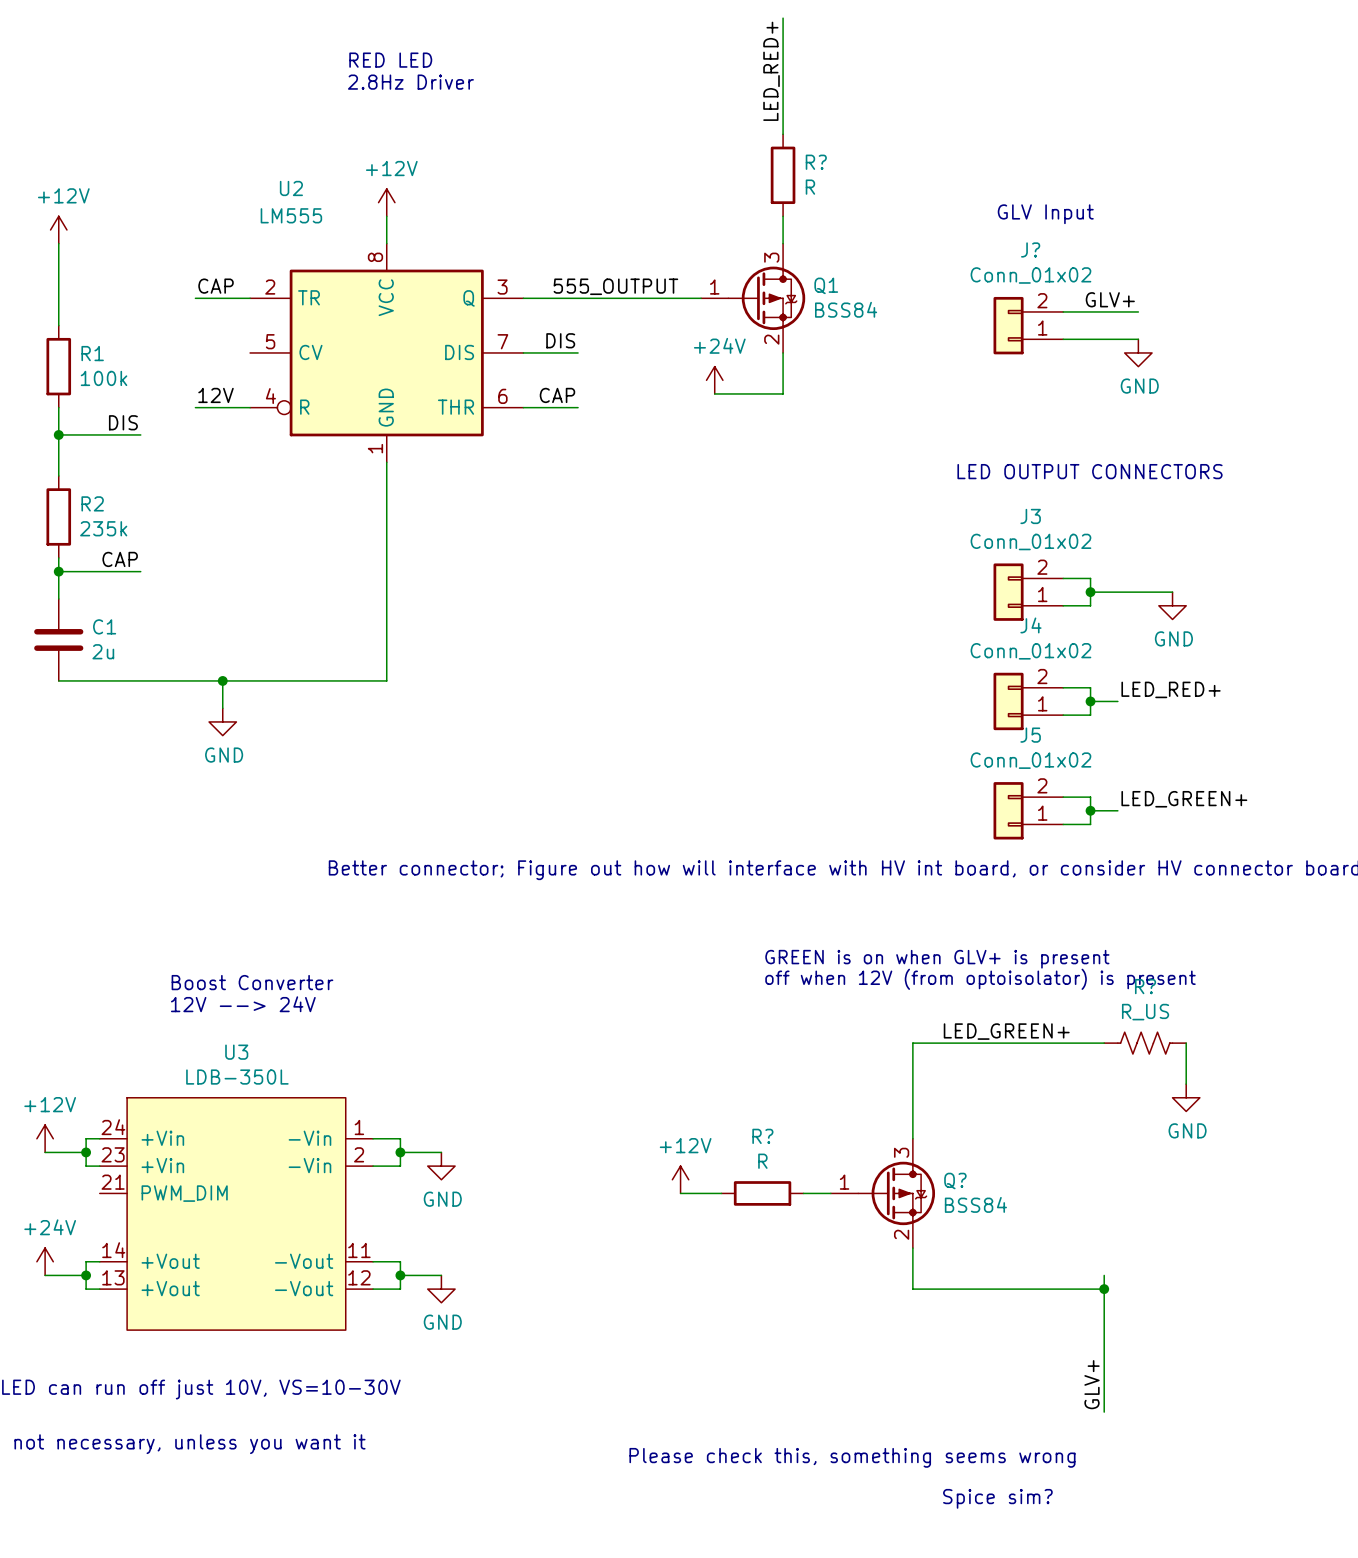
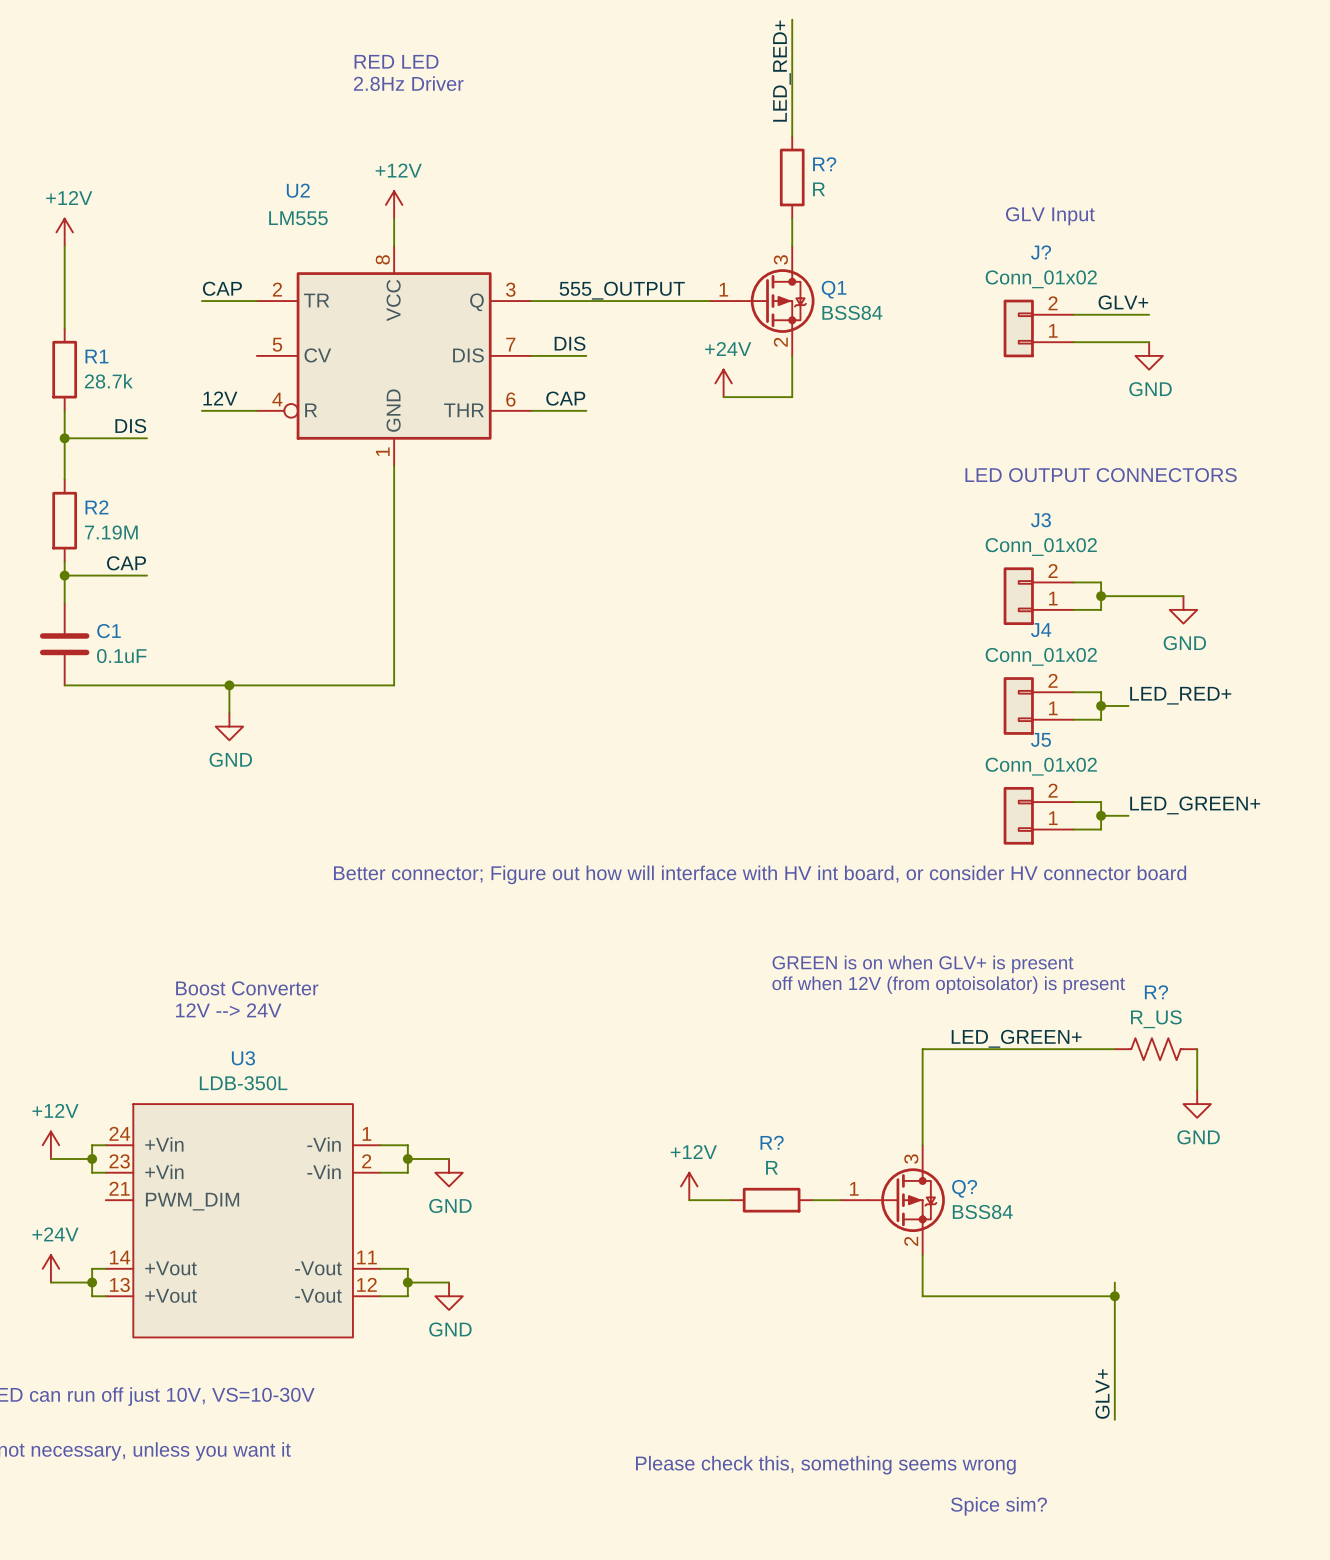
R1 value: 100k (104, 378) -> 28.7k (108, 381)
R2 value: 235k (103, 528) -> 7.19M (111, 532)
C1 value: 2u (103, 651) -> 0.1uF (121, 656)

